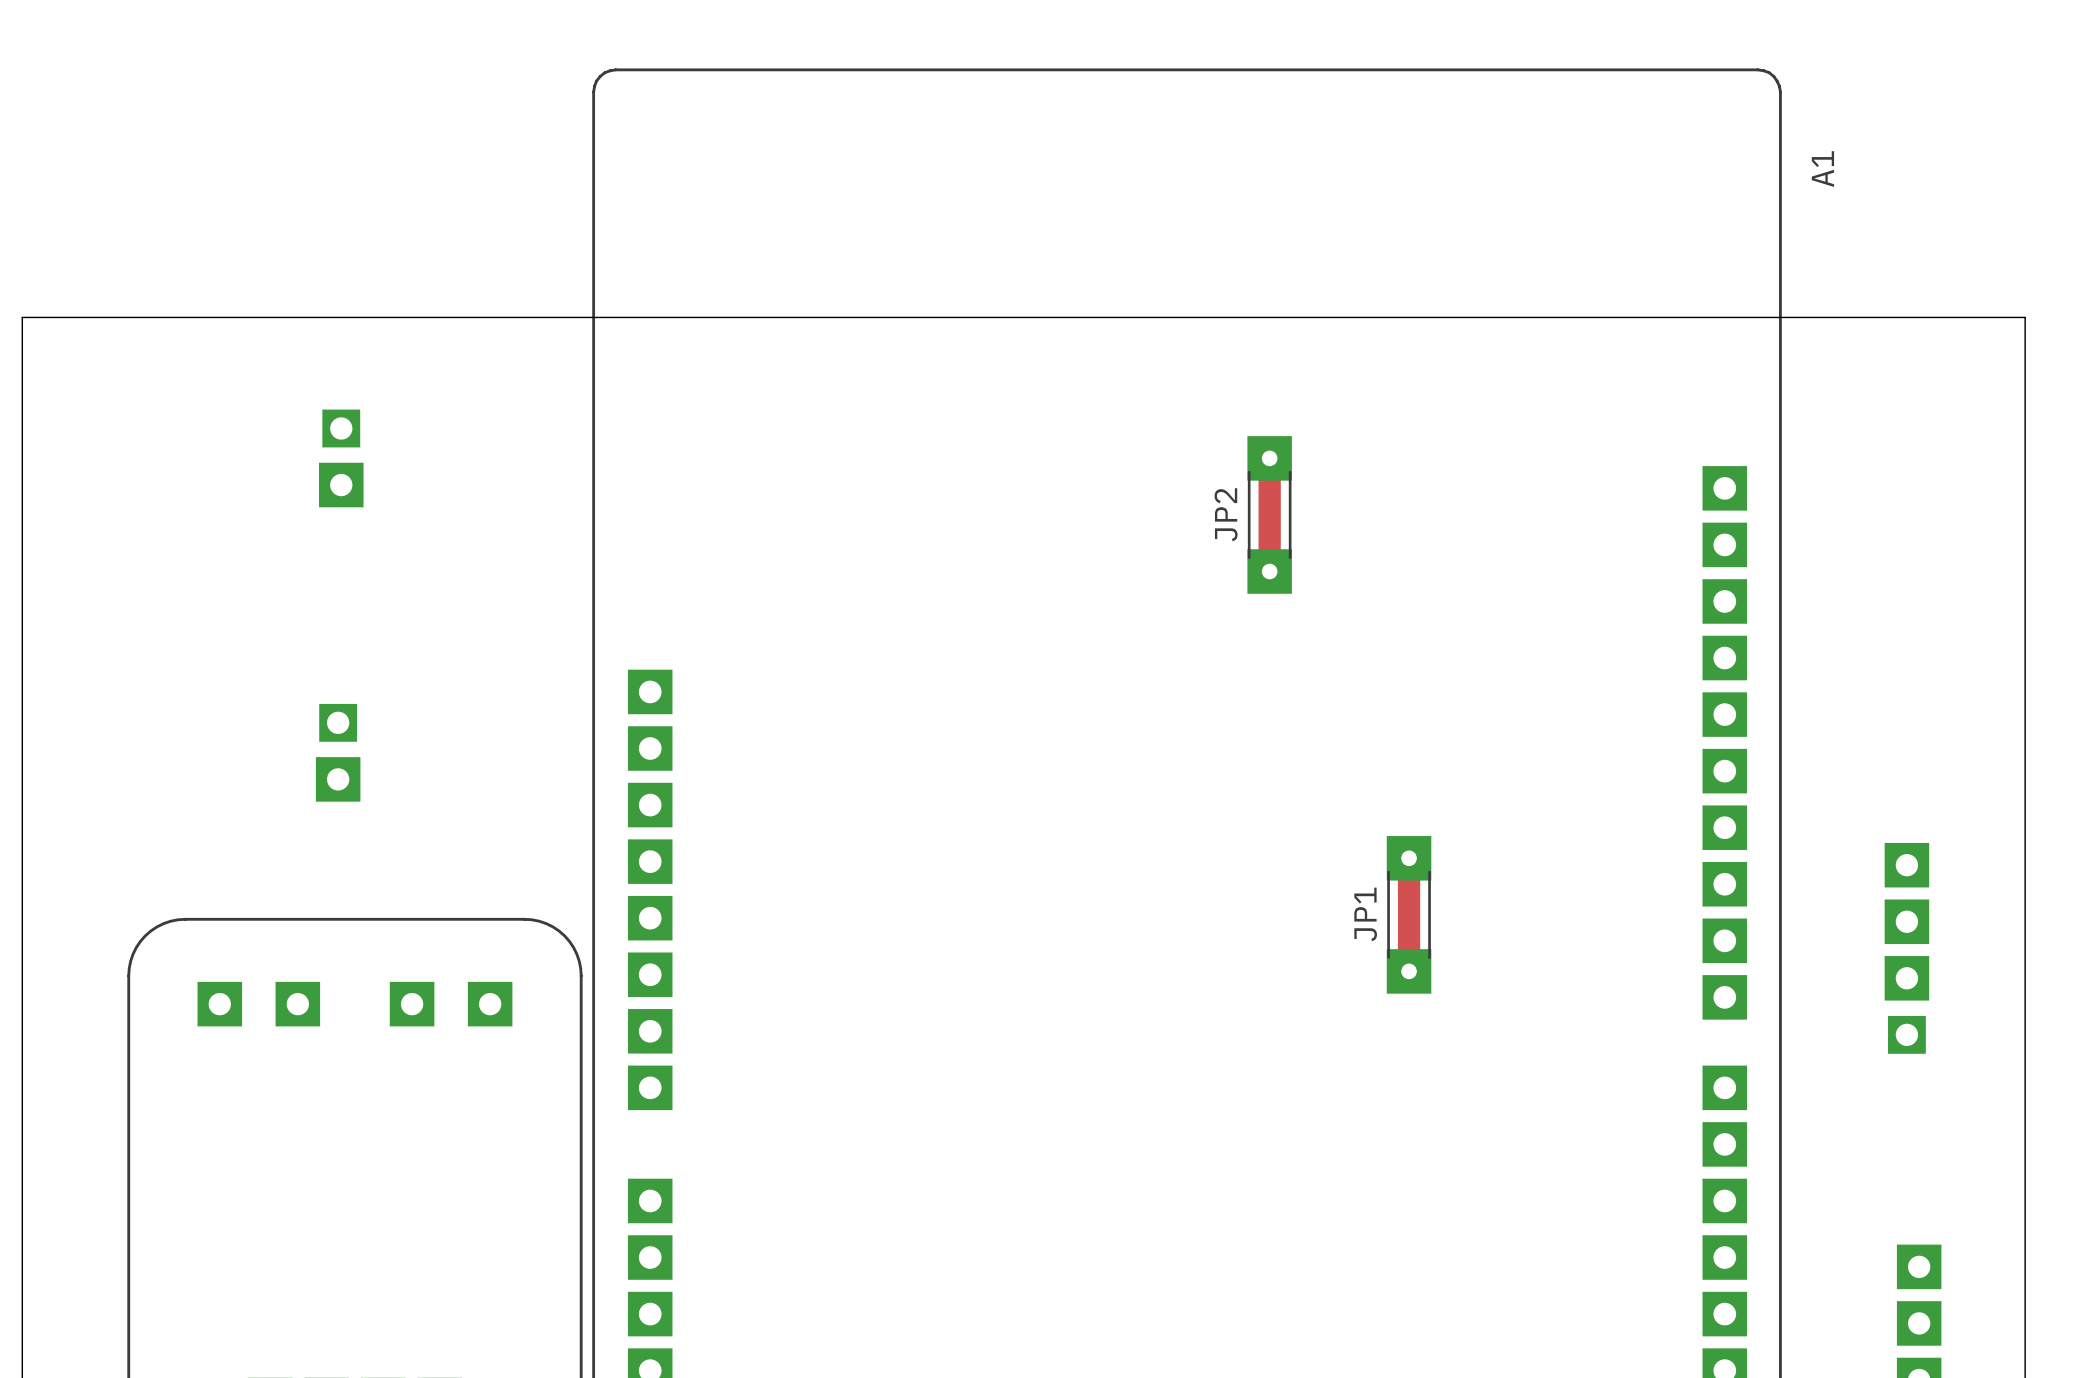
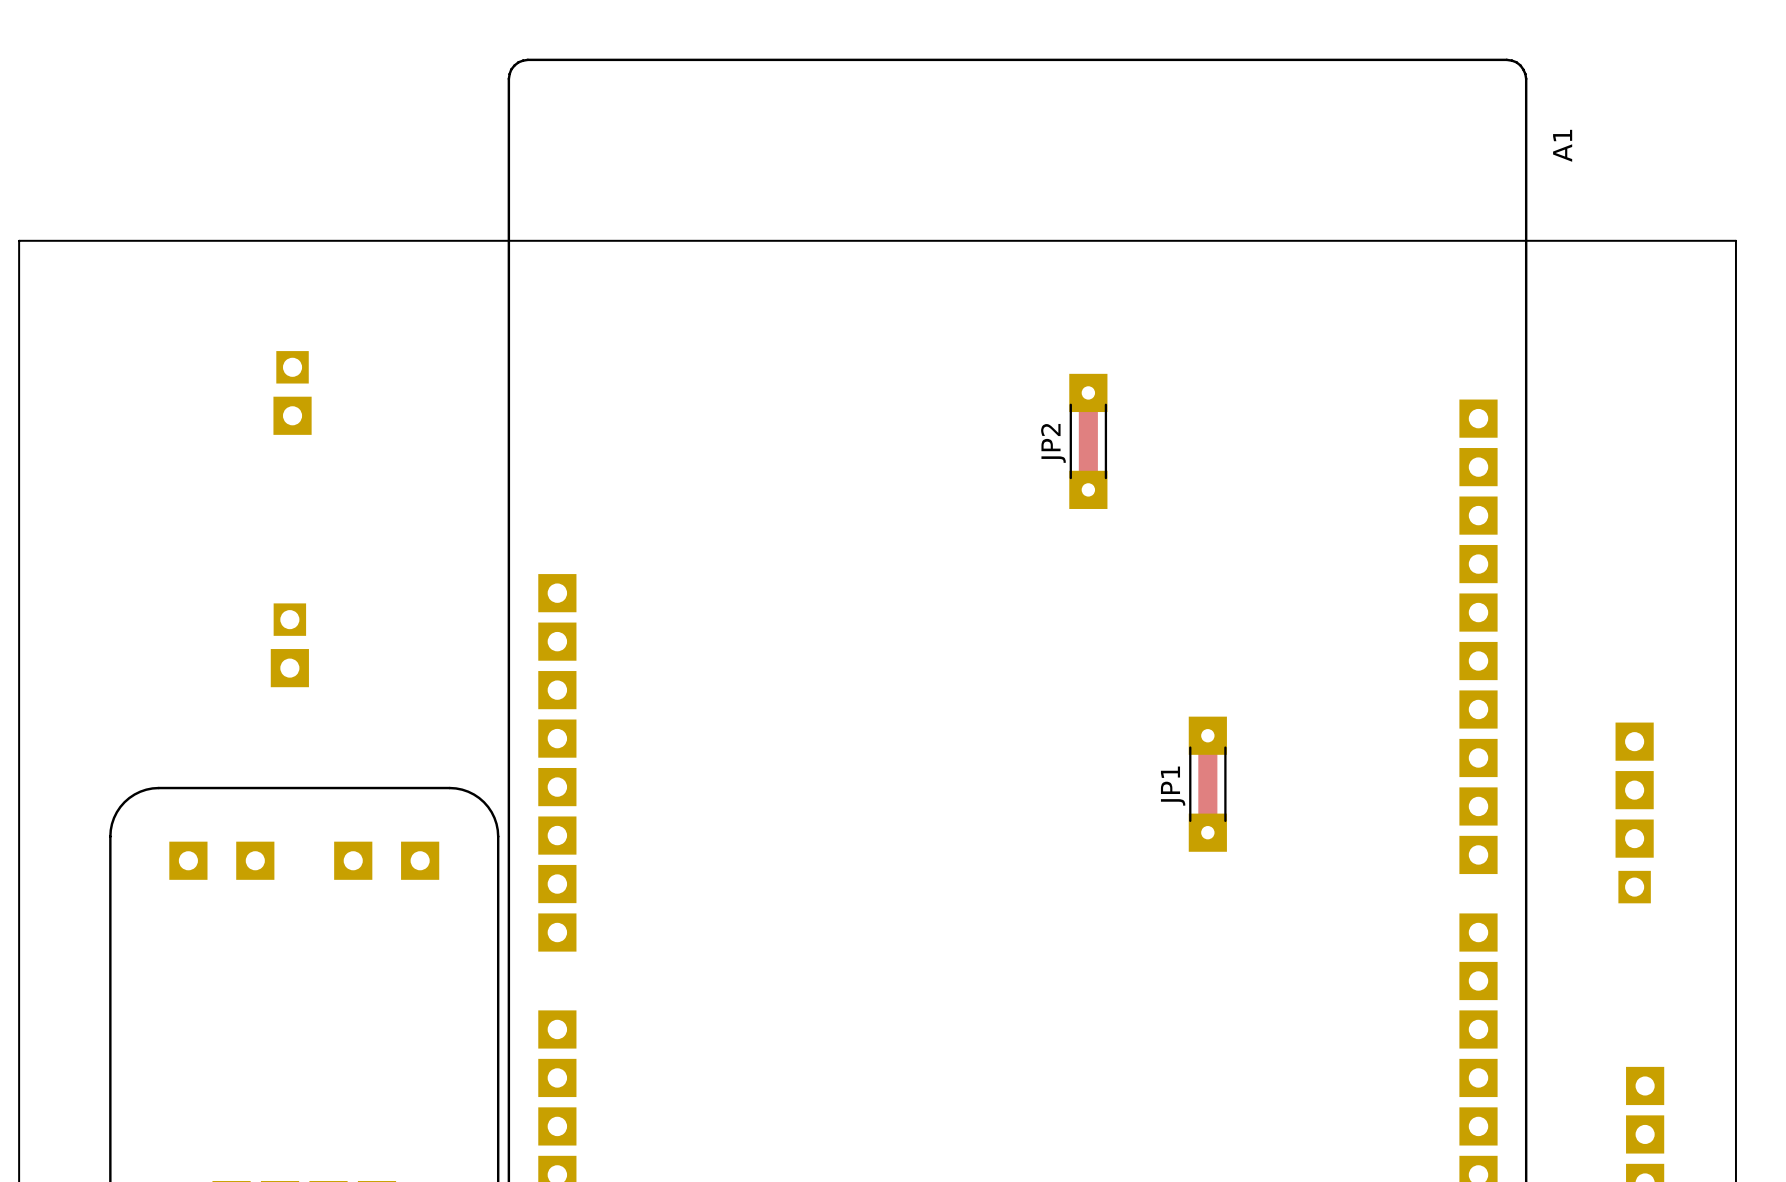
board edge: (22, 317) (2025, 317) -> (19, 272) (19, 240) (1735, 240) (1735, 272)

